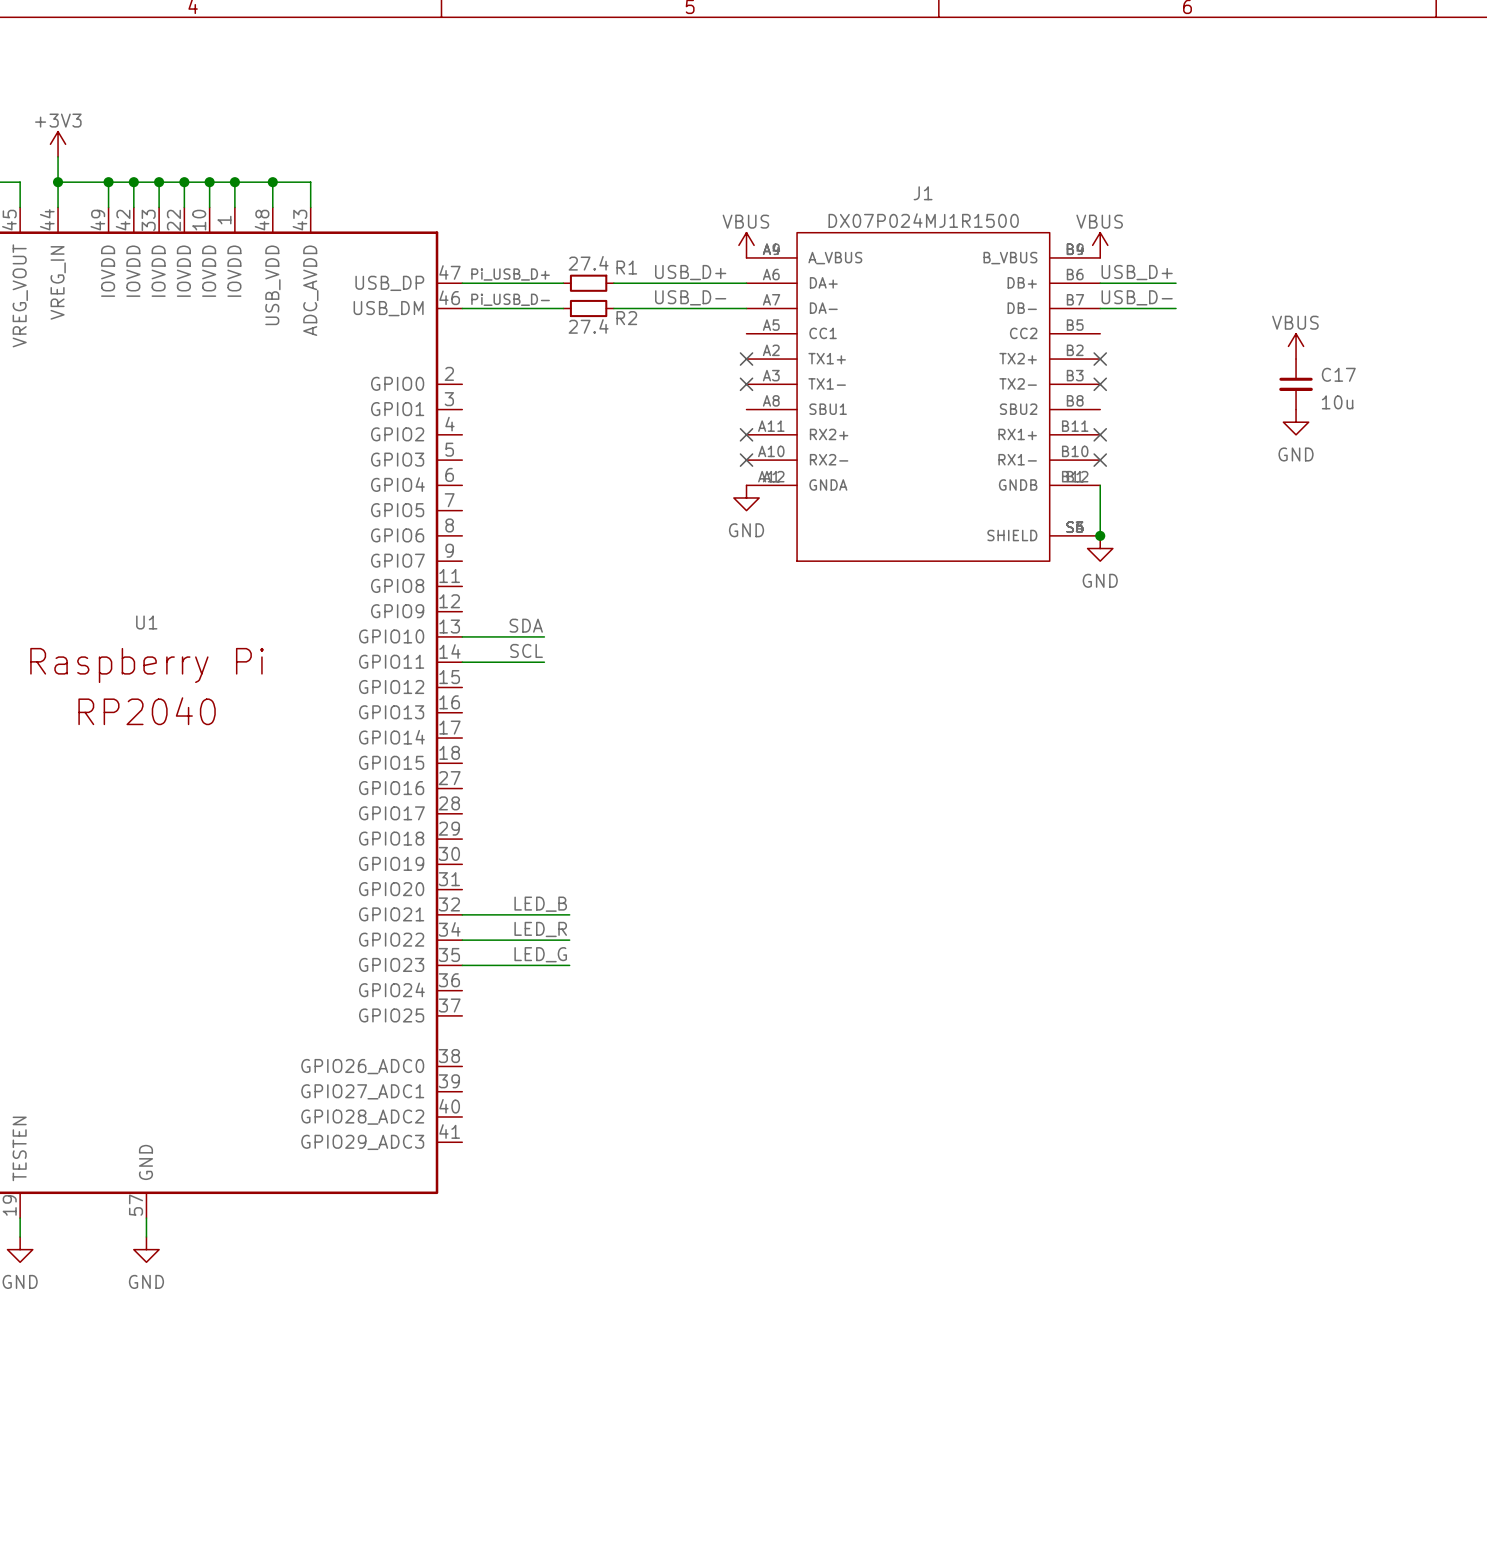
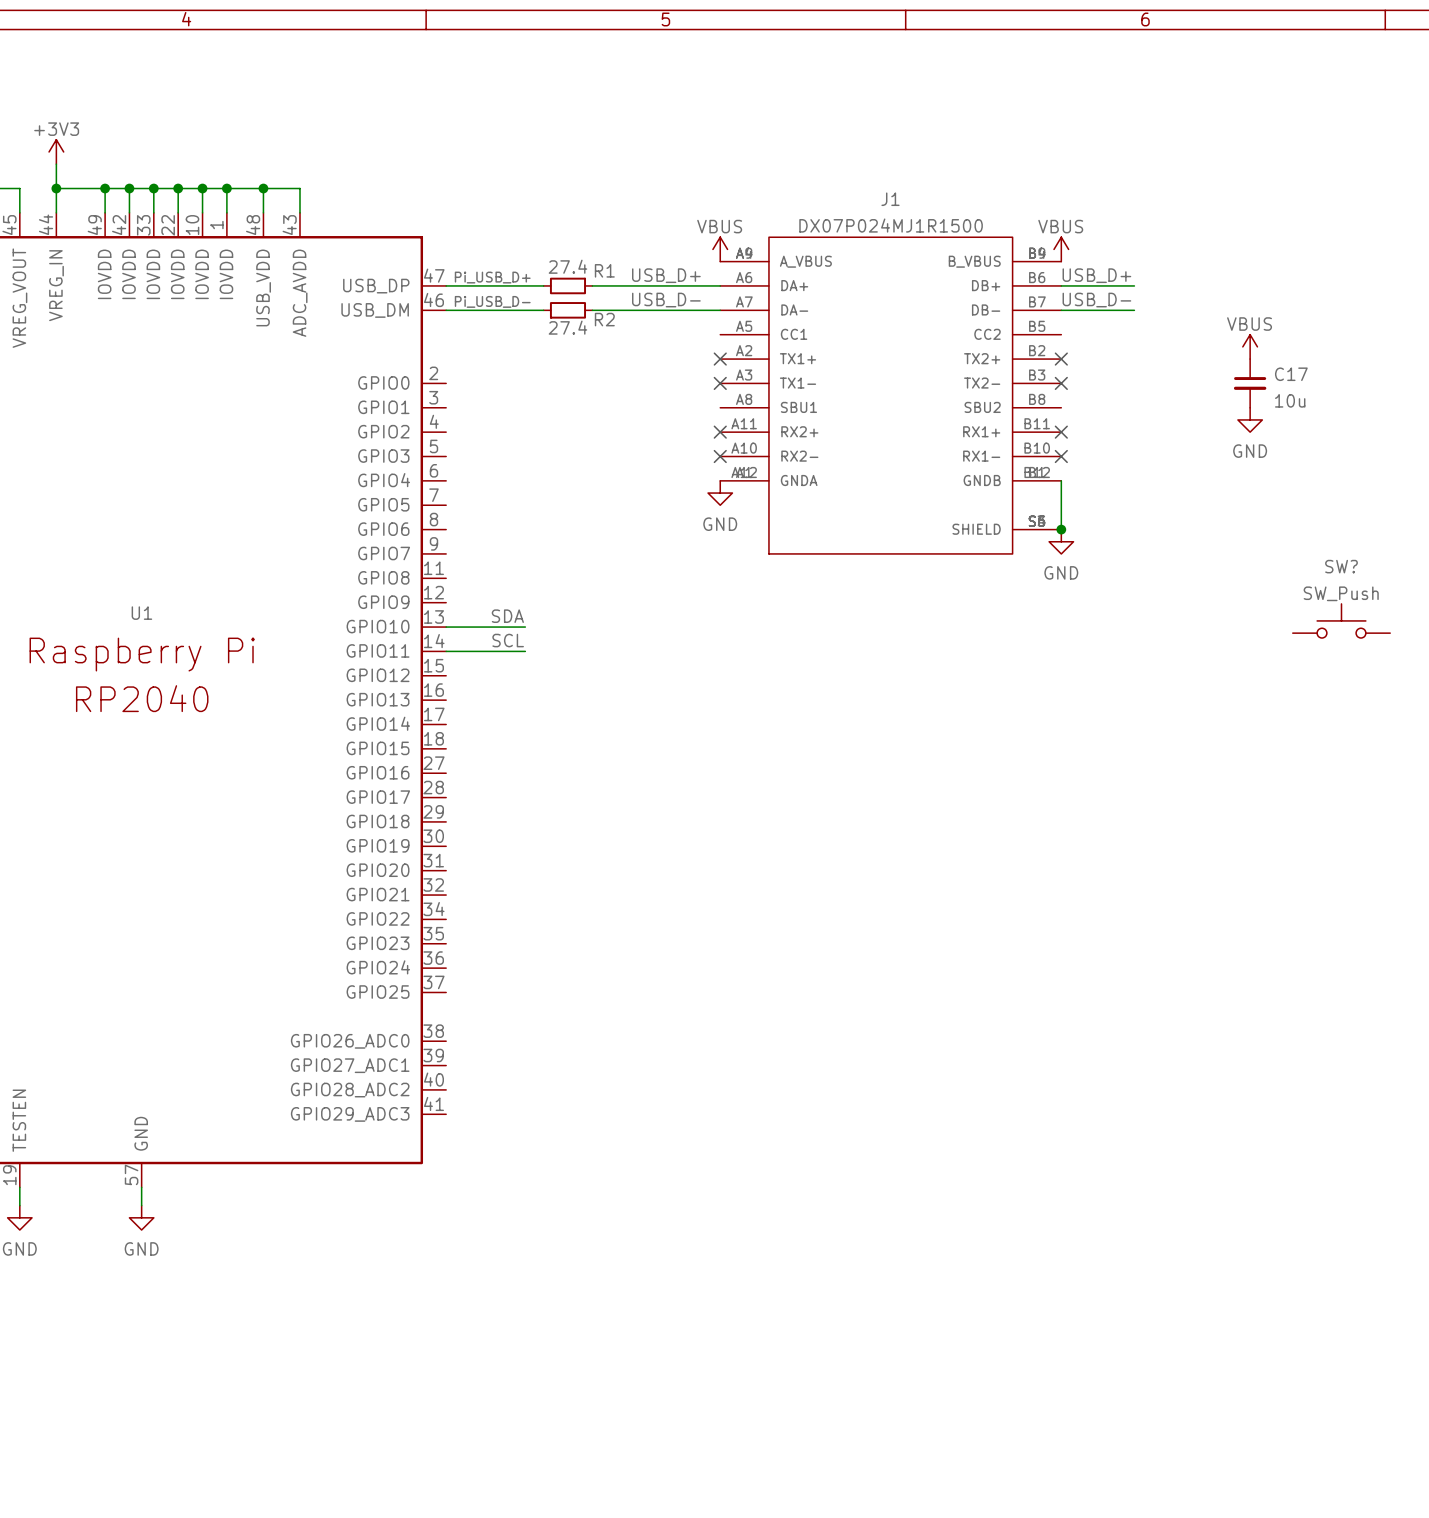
SW?: none -> SW_Push (1341, 620)
label: LED_B (540, 904) -> none
wire: (462, 914) (569, 914) -> none
label: LED_R (540, 929) -> none
wire: (462, 940) (569, 940) -> none
label: LED_G (540, 954) -> none
wire: (462, 965) (569, 965) -> none

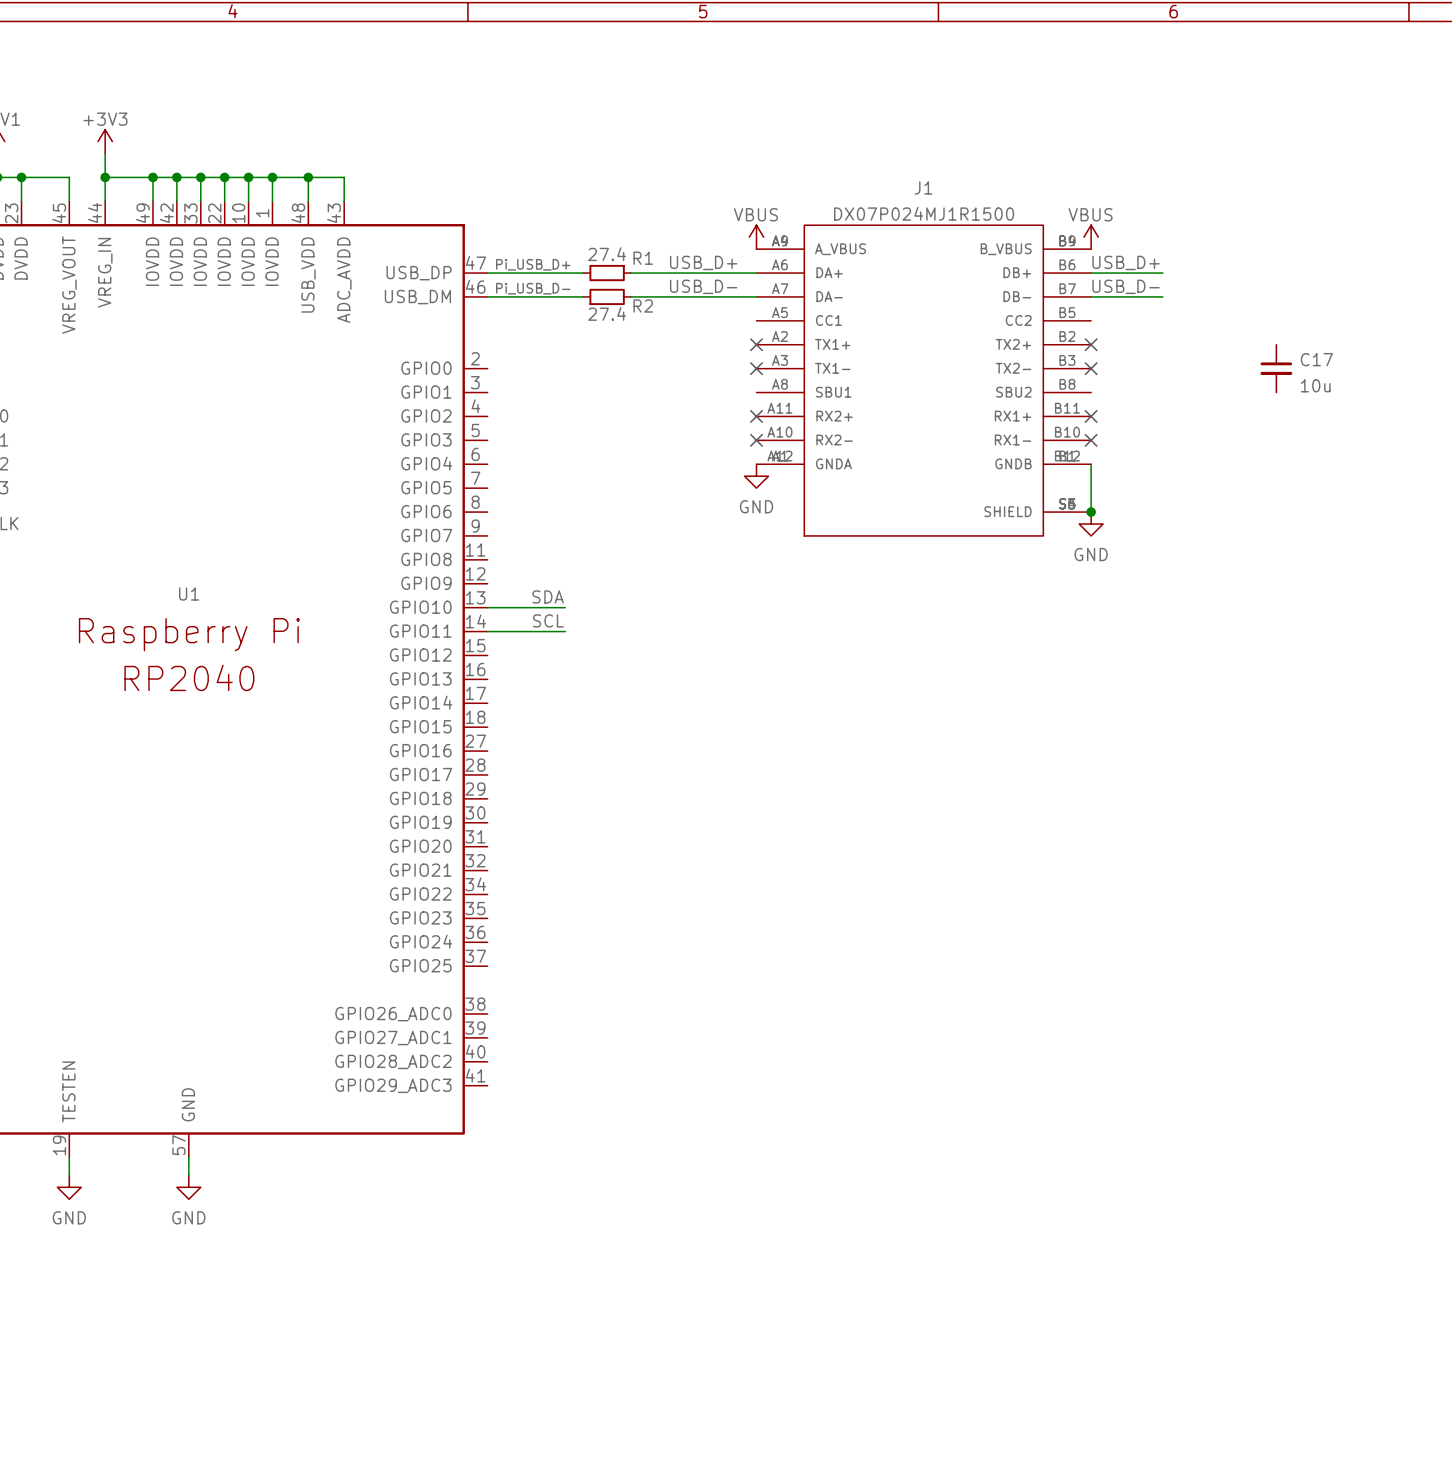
power symbol: VBUS (1250, 346) -> none
power symbol: GND (1250, 419) -> none
SW?: SW_Push (1341, 620) -> none

